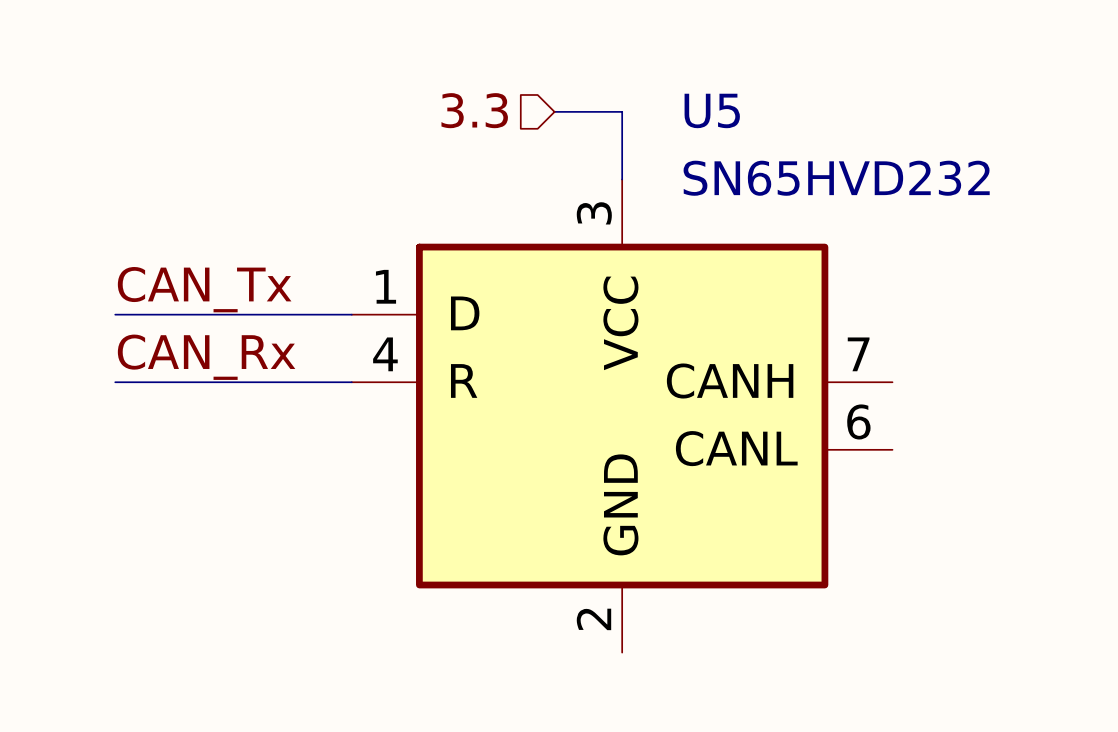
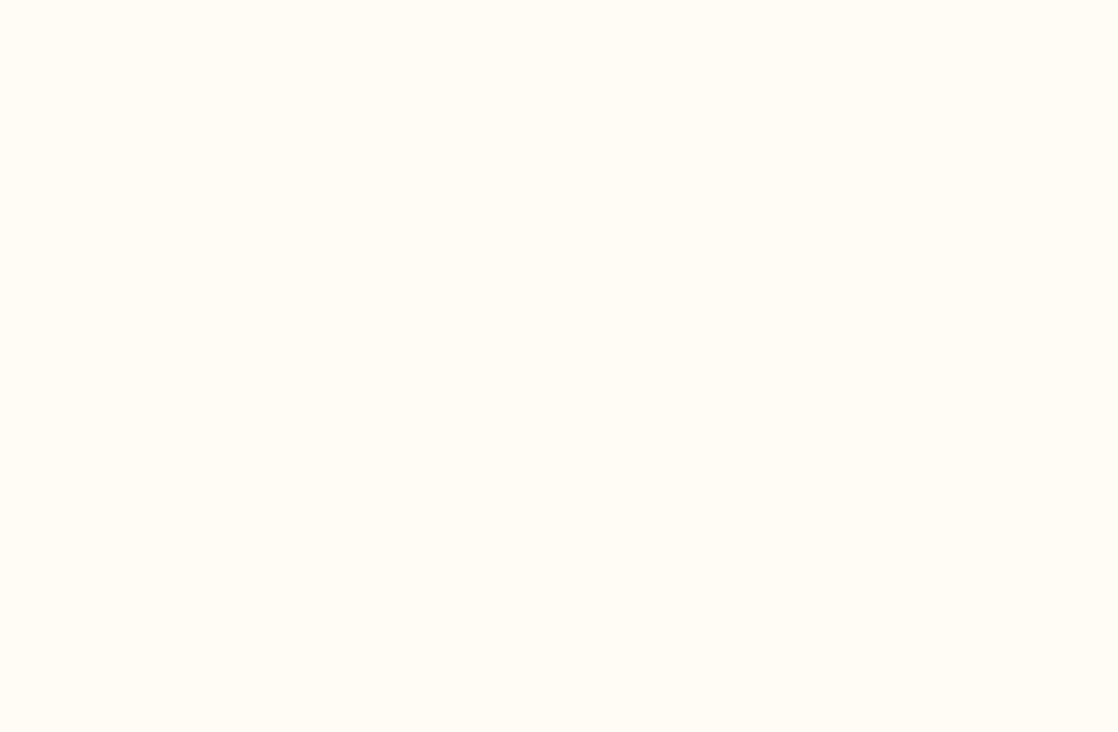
hierarchical label: 3.3 (474, 110) -> none
wire: (554, 111) (622, 111) (622, 179) -> none
label: CAN_Tx (204, 289) -> none
wire: (115, 314) (351, 314) -> none
label: CAN_Rx (206, 357) -> none
wire: (115, 382) (351, 382) -> none
U5: SN65HVD232 (622, 416) -> none

